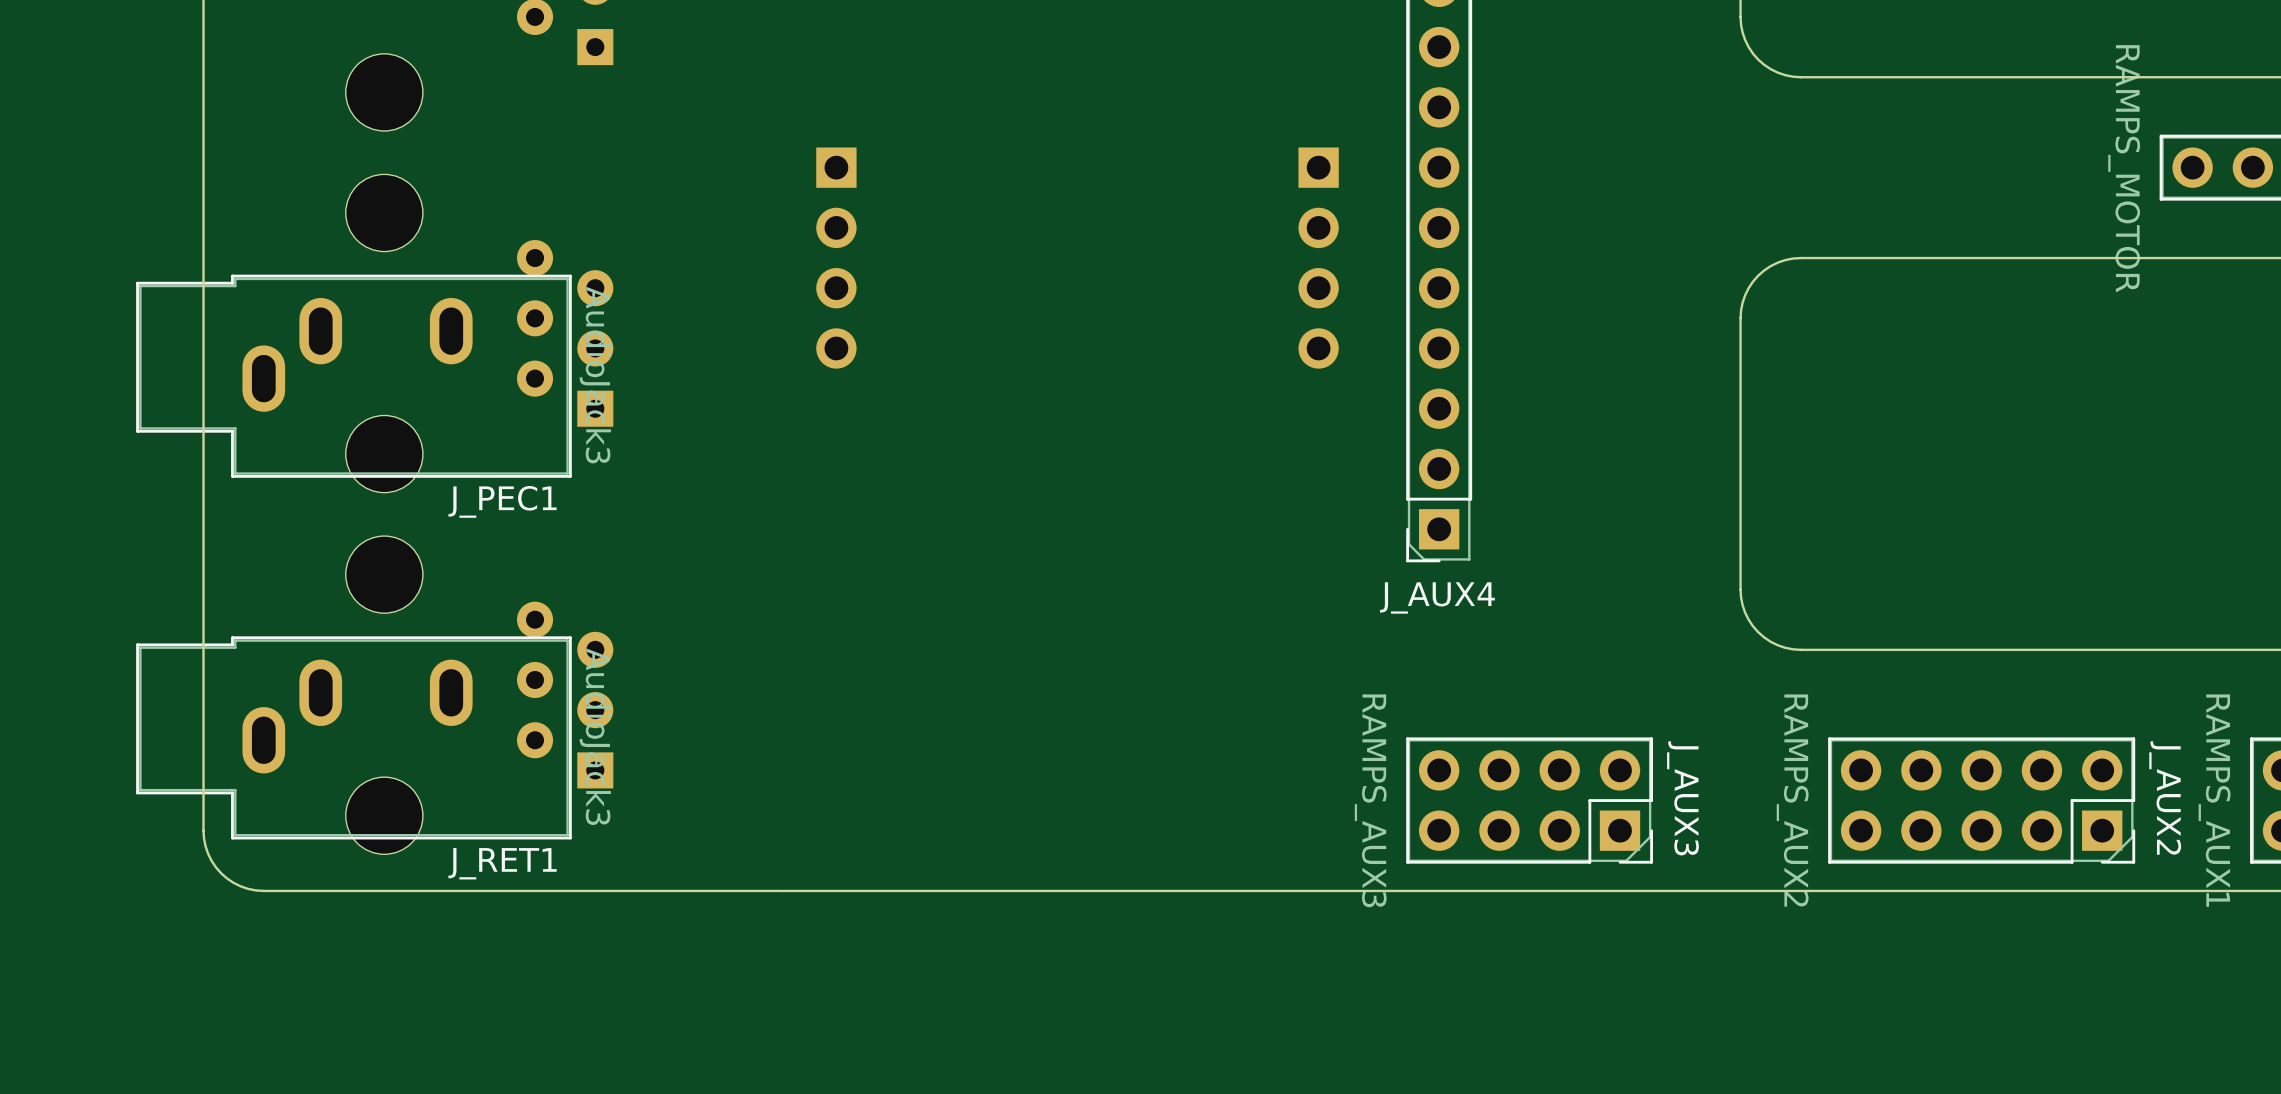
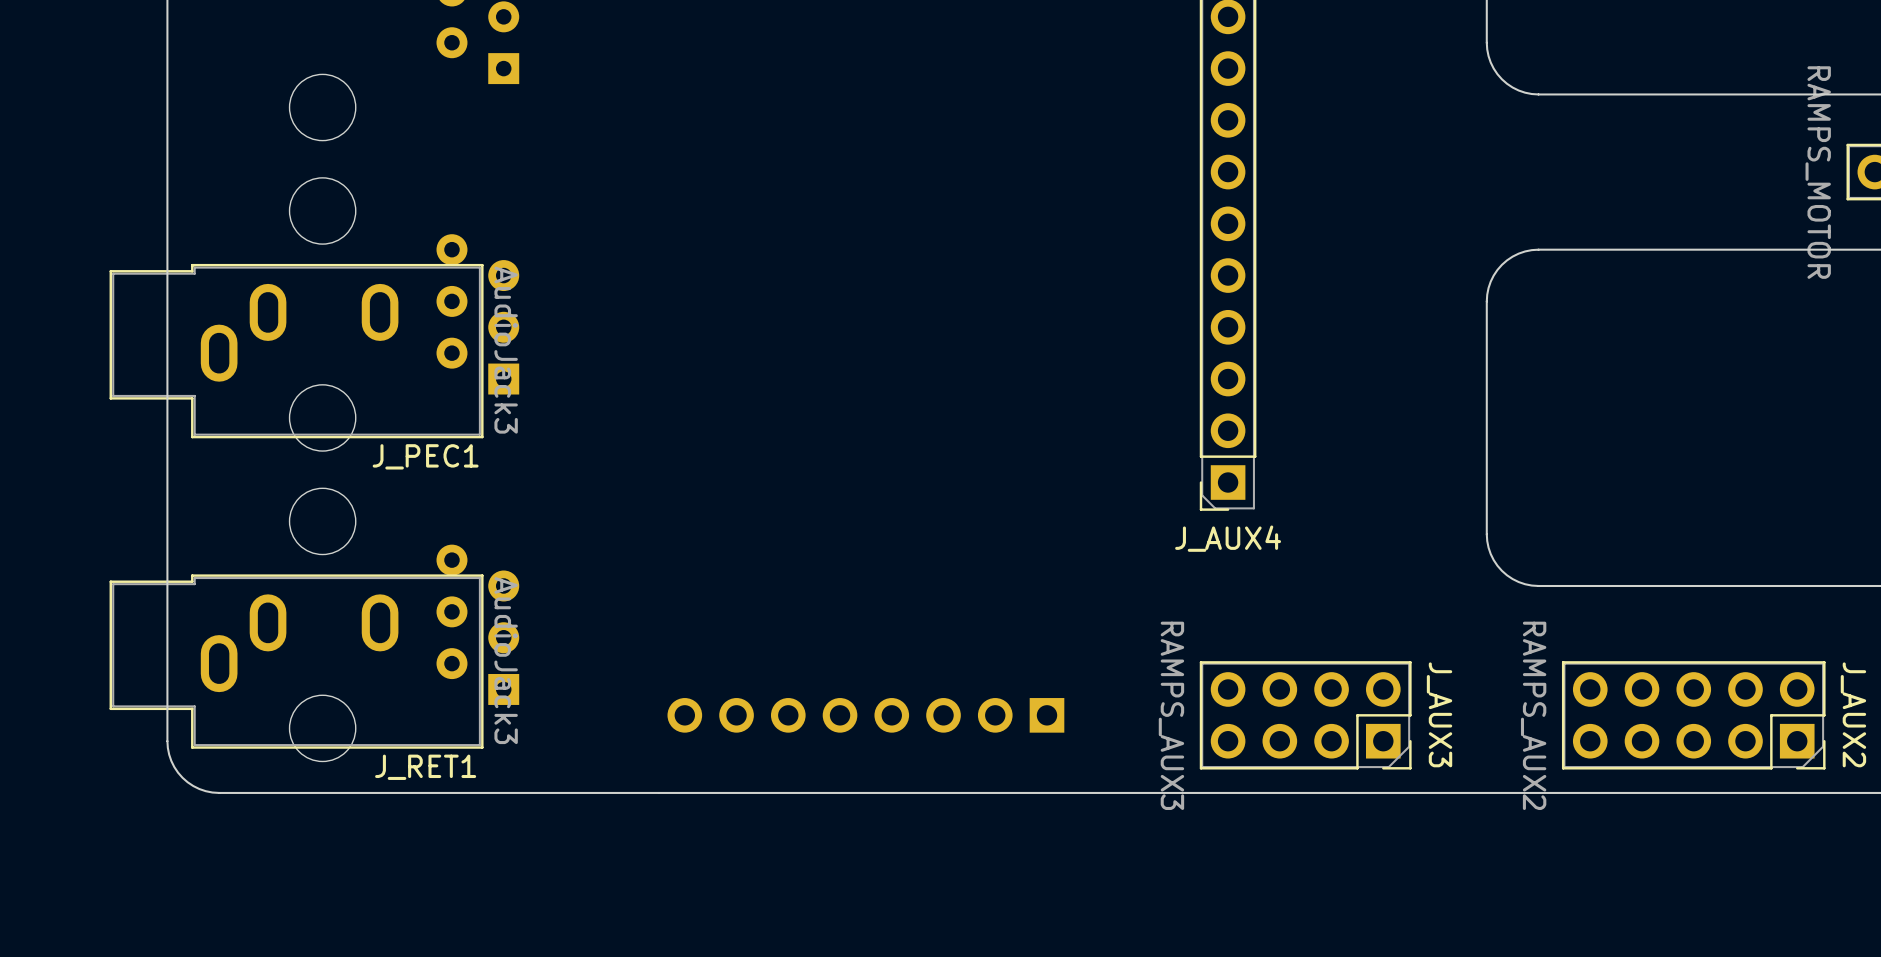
part: (836, 258) -> none
part: (1318, 258) -> none
part: none -> (865, 715)

